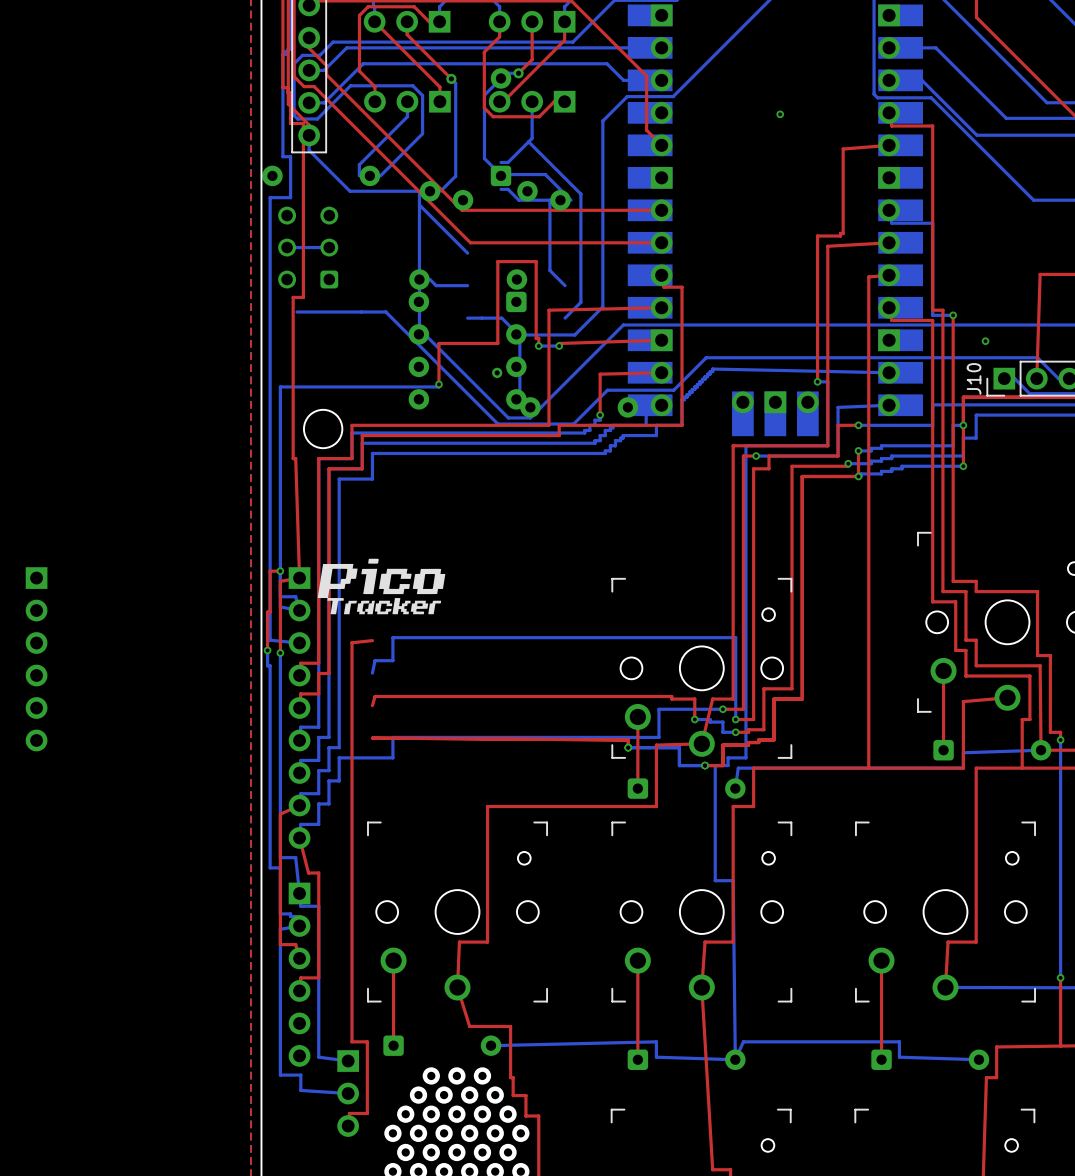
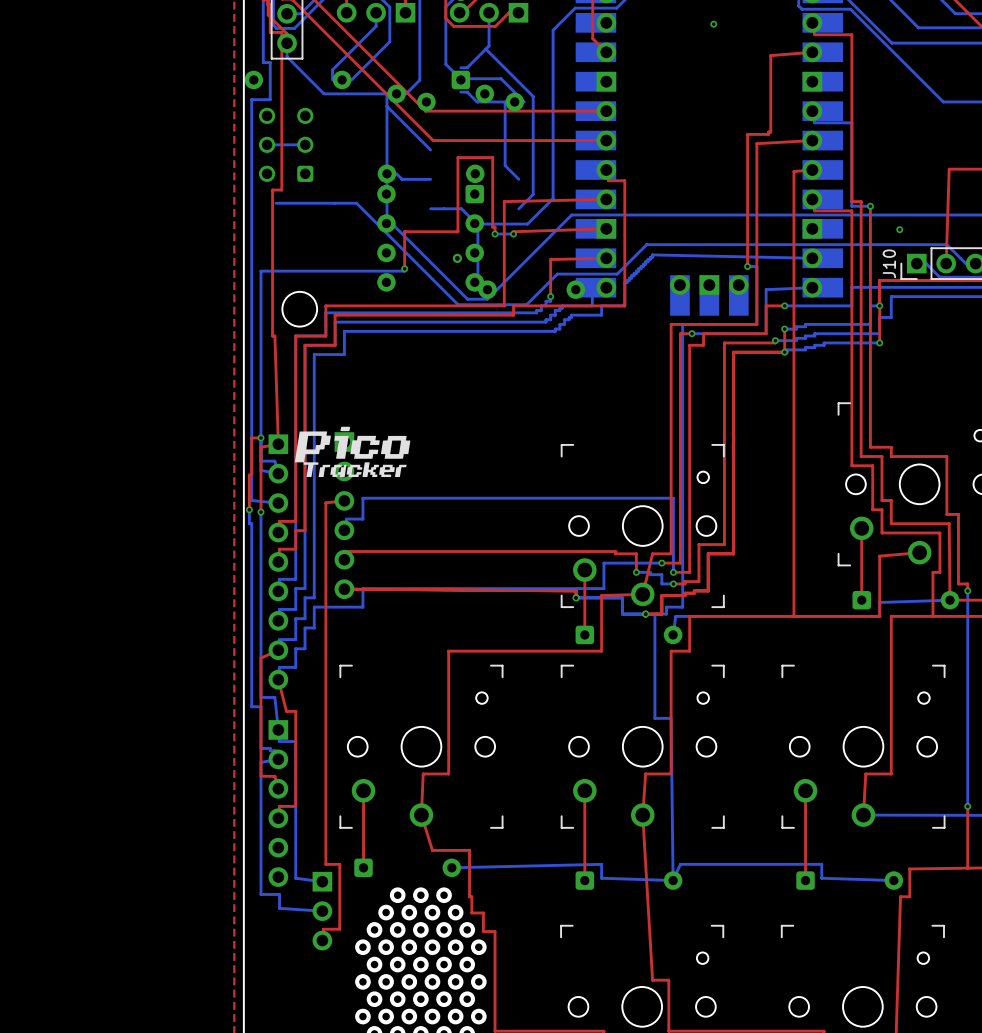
part: none -> (344, 515)
part: (36, 659) -> none

